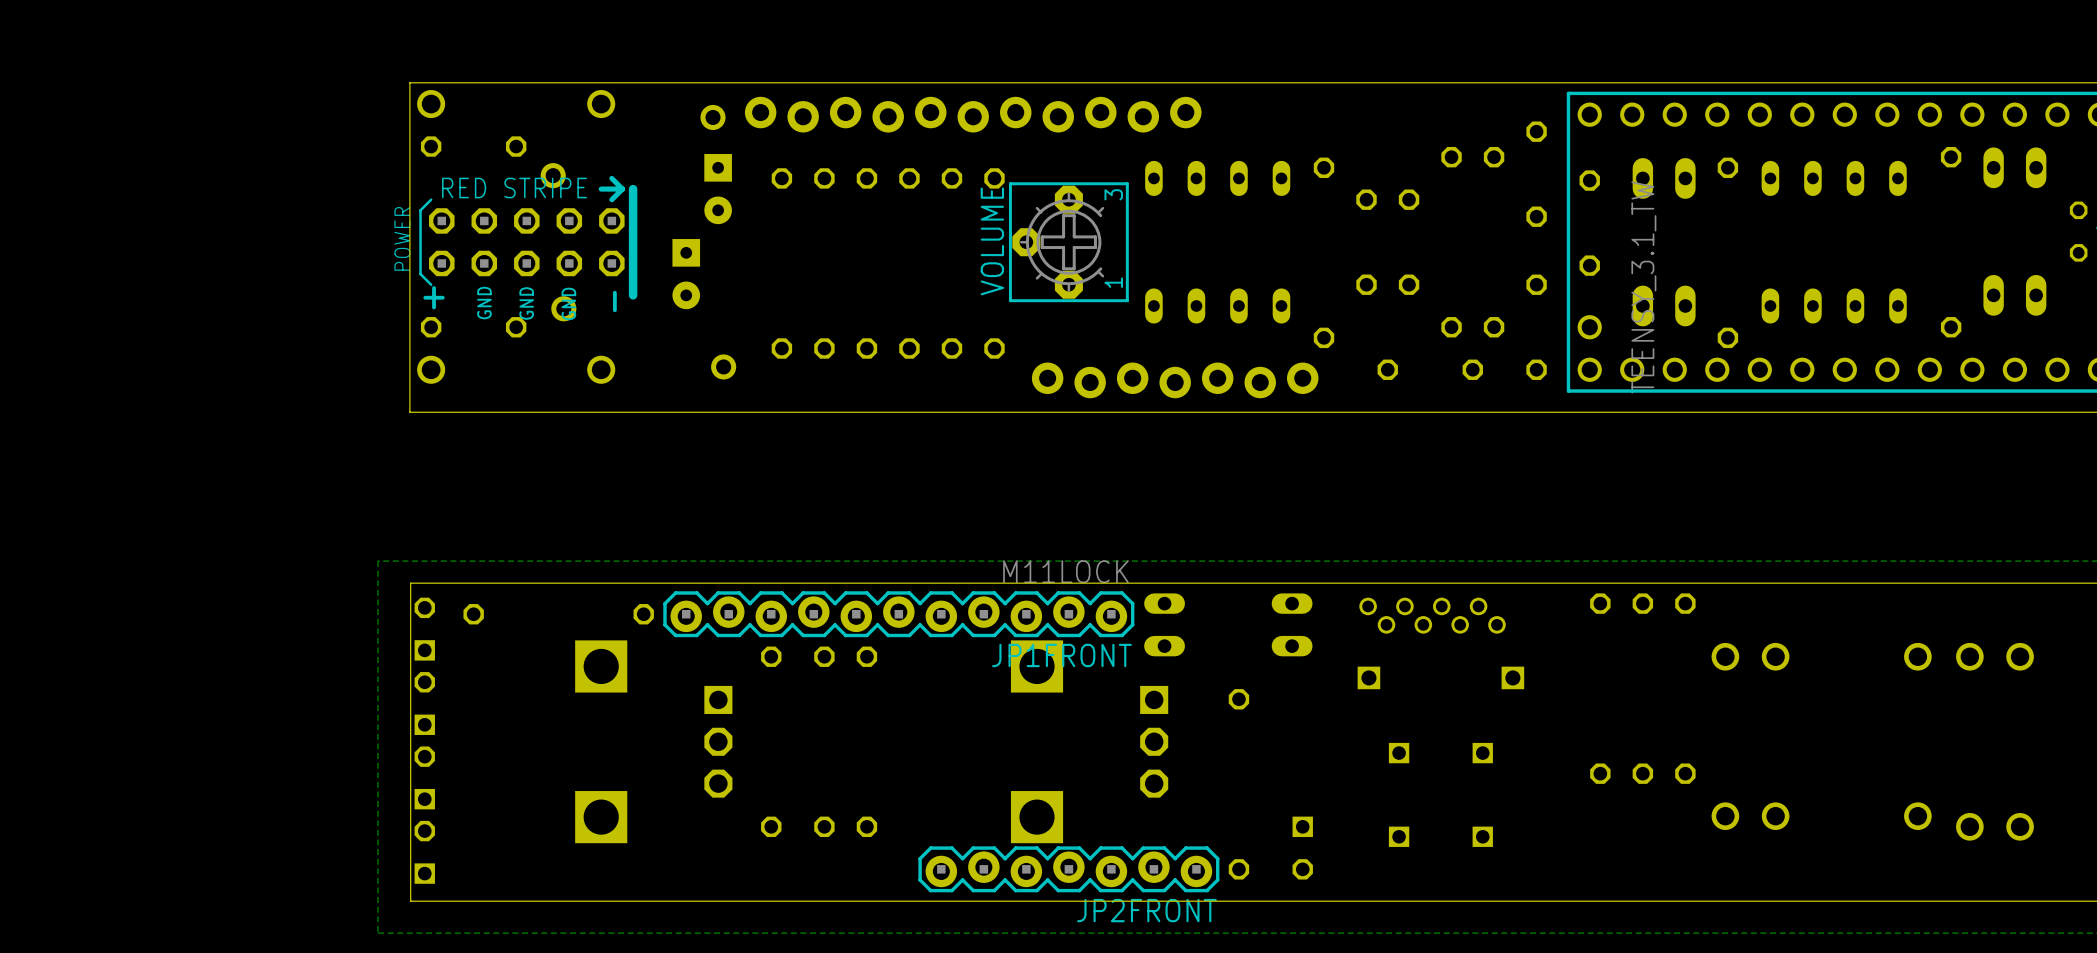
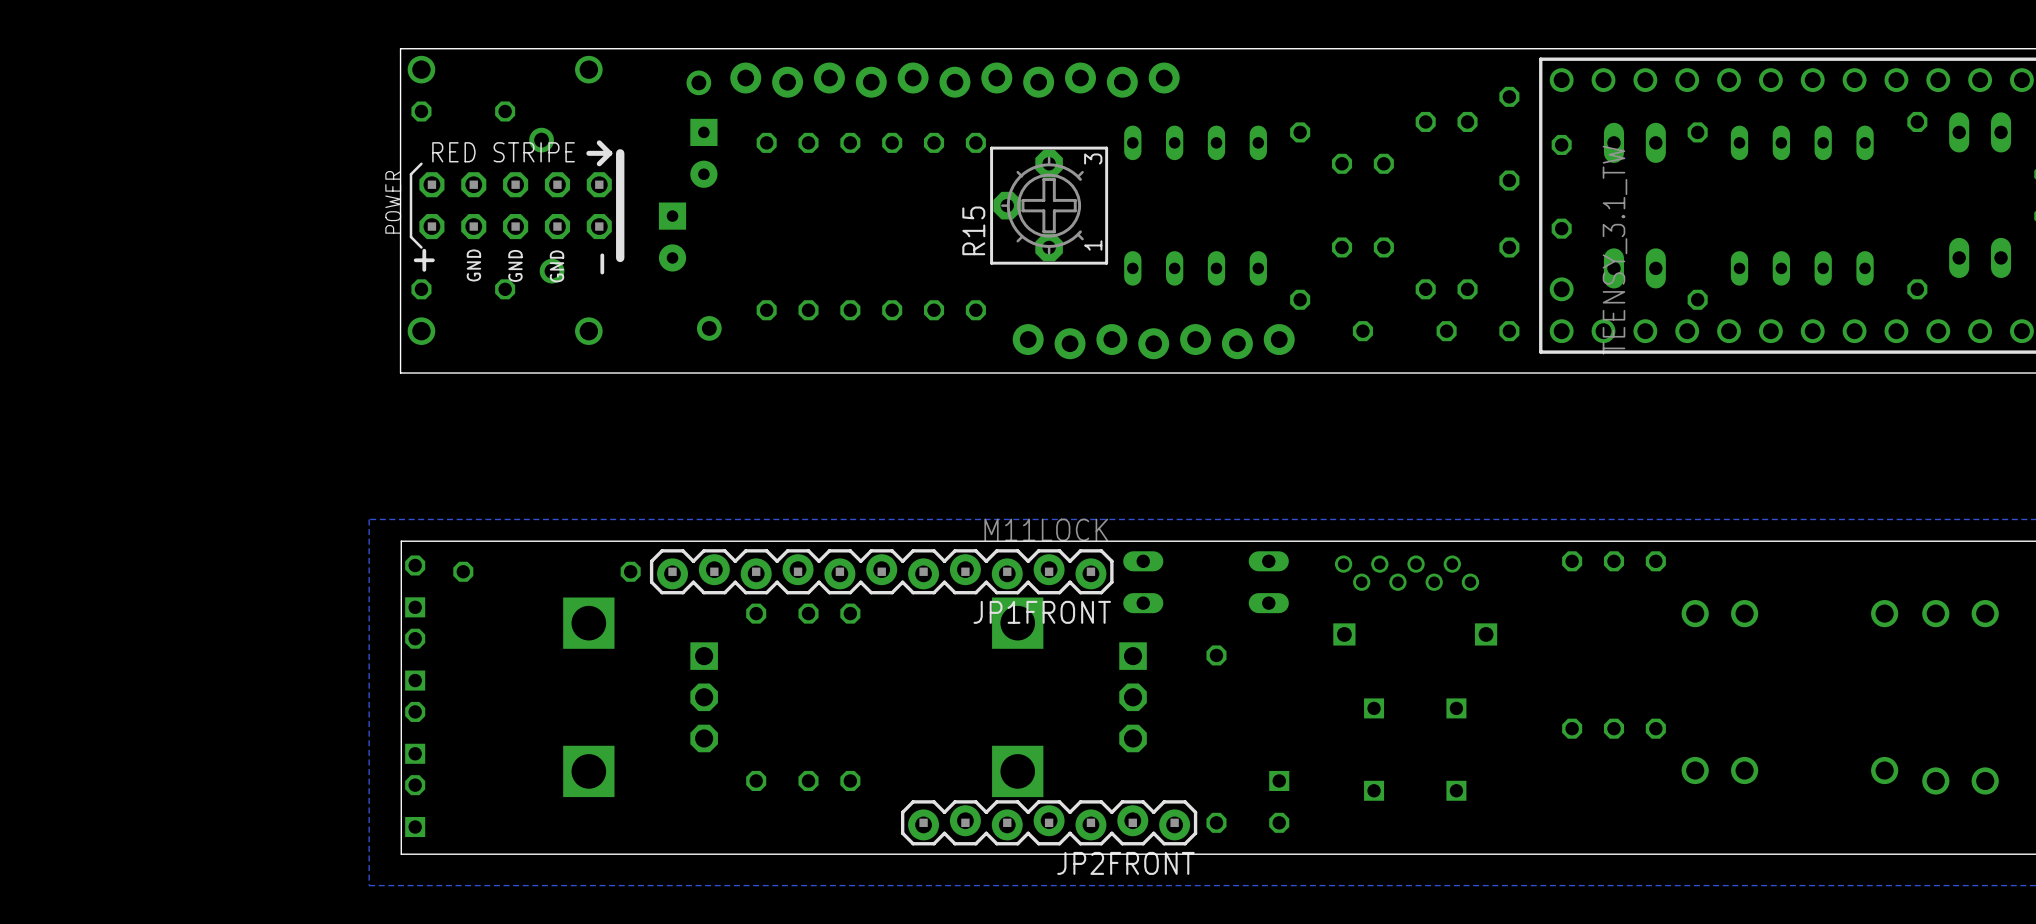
VOLUME name: VOLUME (992, 241) -> R15 (973, 230)

